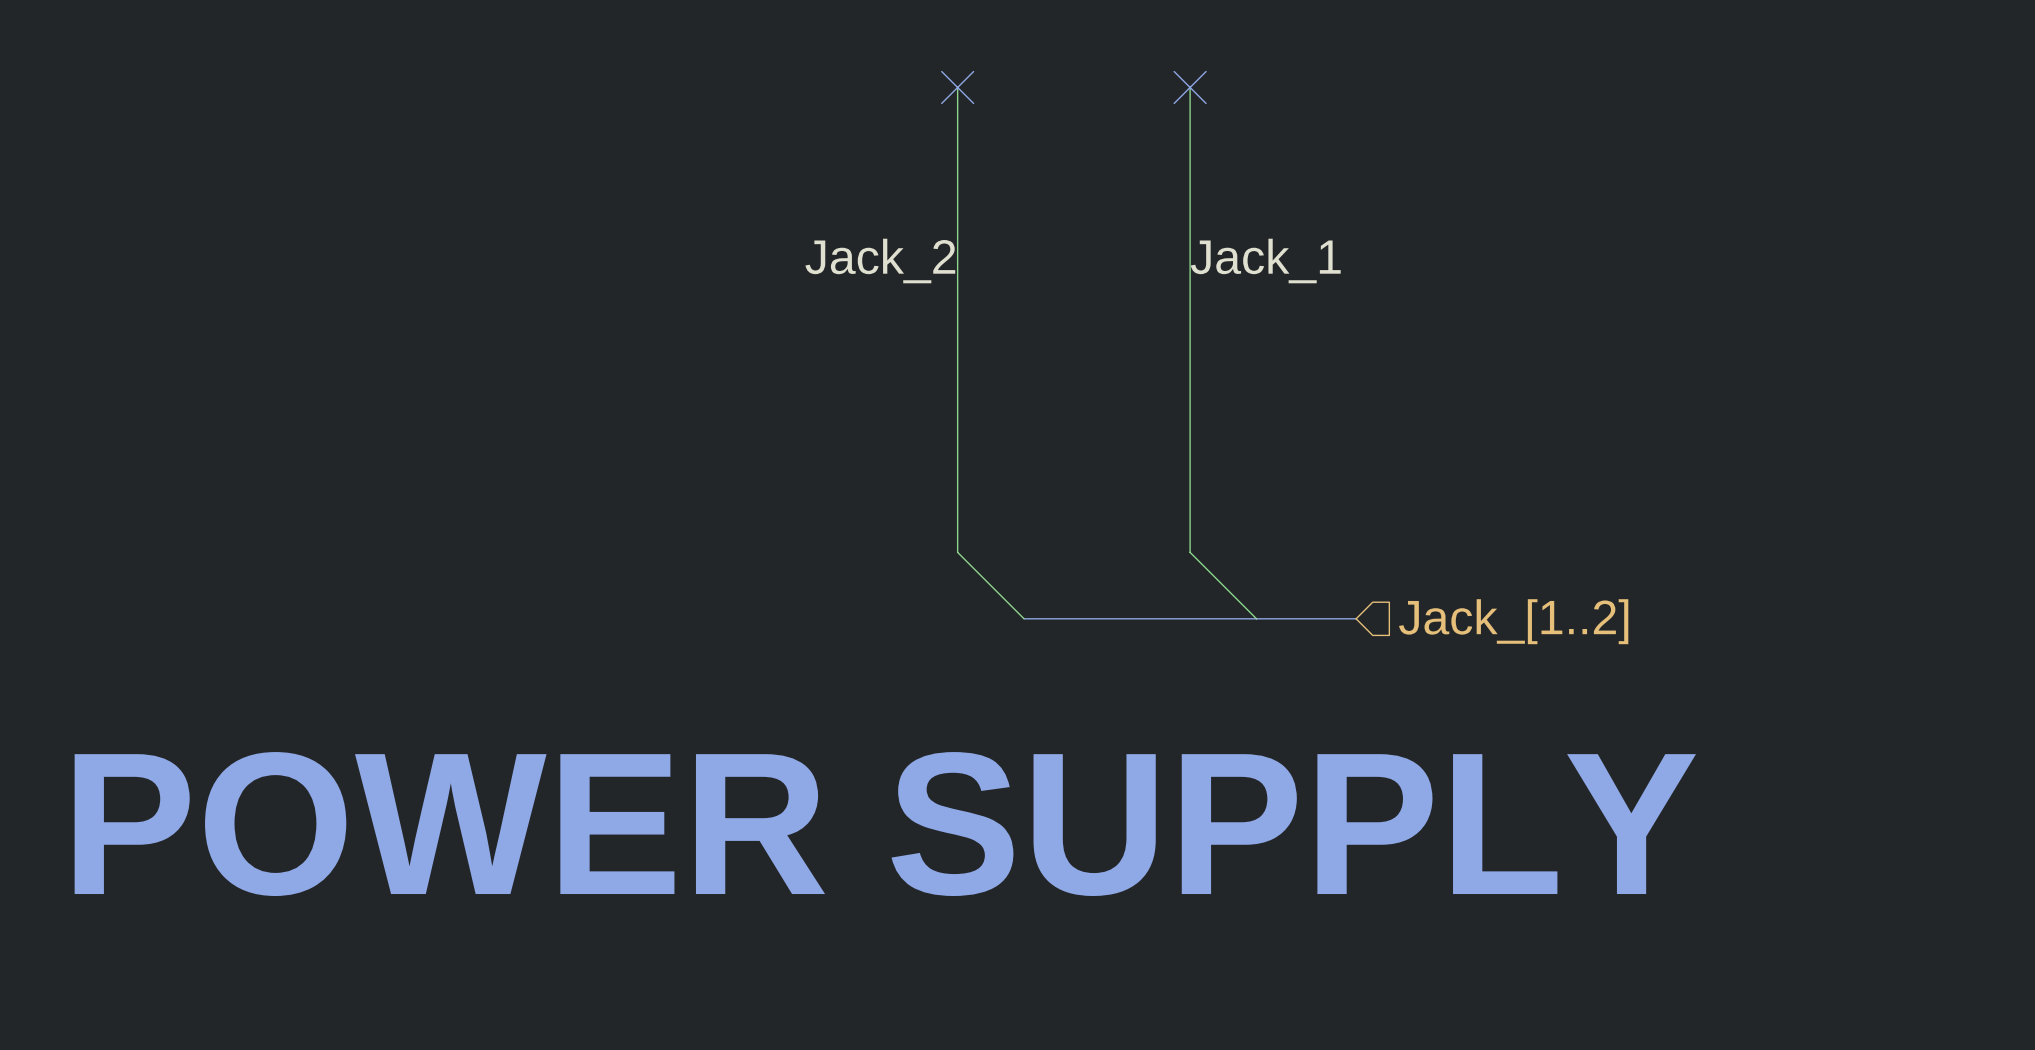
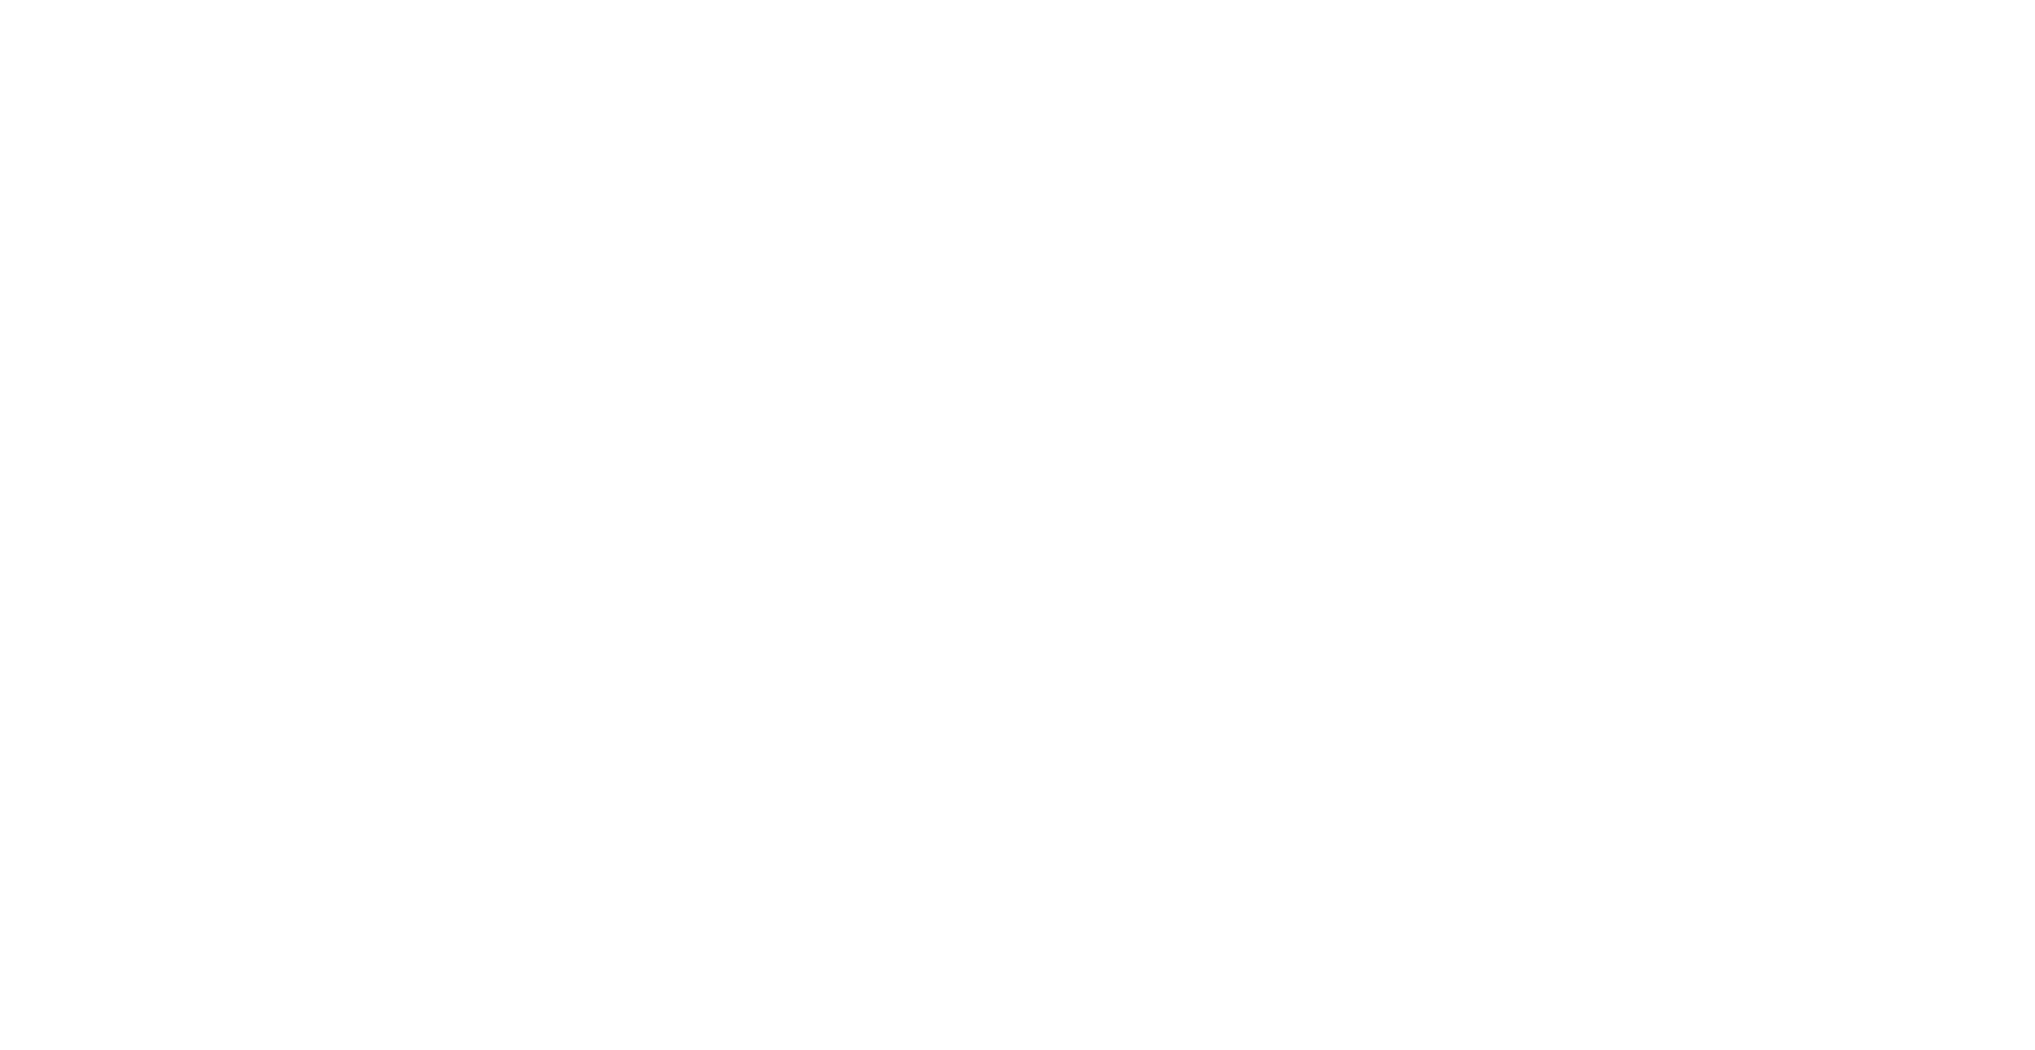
wire: (957, 87) (957, 552) (1024, 618) -> none
no-connect mark: (957, 87) -> none
wire: (1190, 87) (1190, 552) (1256, 618) -> none
no-connect mark: (1190, 87) -> none
label: Jack_2 (880, 261) -> none
label: Jack_1 (1265, 261) -> none
bus: (1024, 618) (1356, 618) -> none
hierarchical label: Jack_[1..2] (1513, 621) -> none
text: POWER SUPPLY (885, 824) -> none

